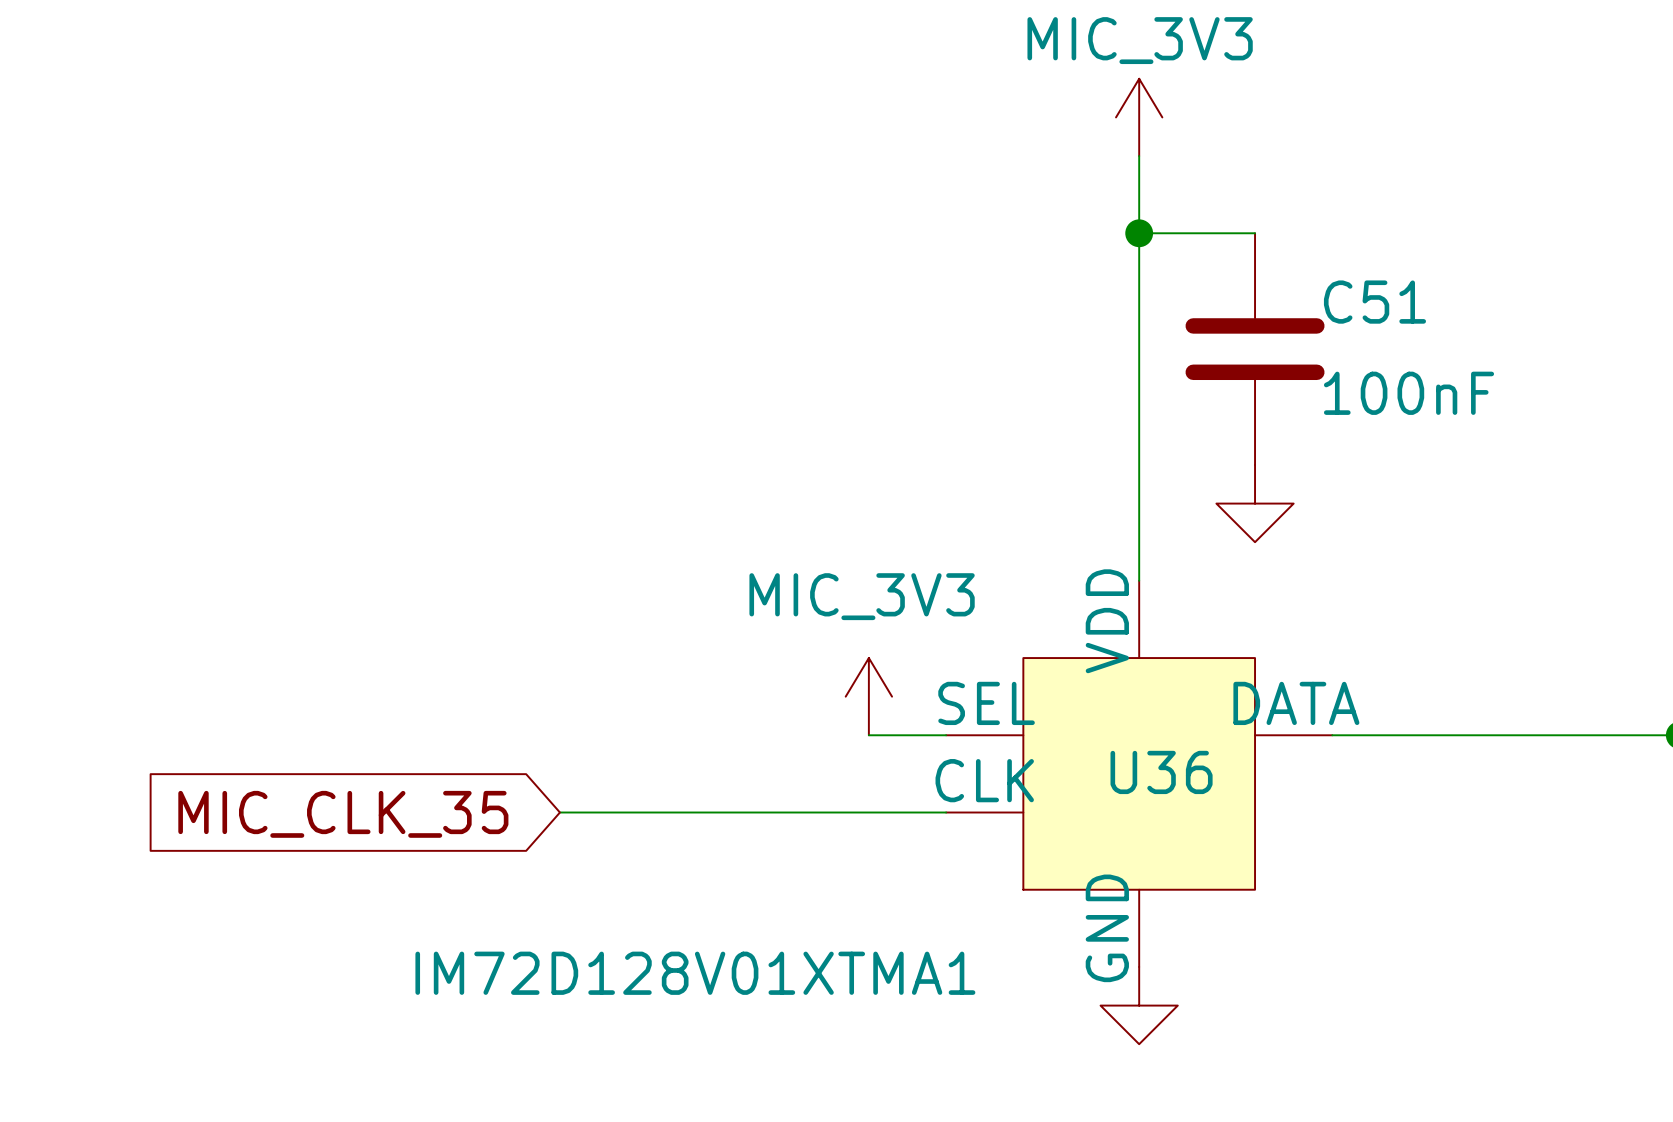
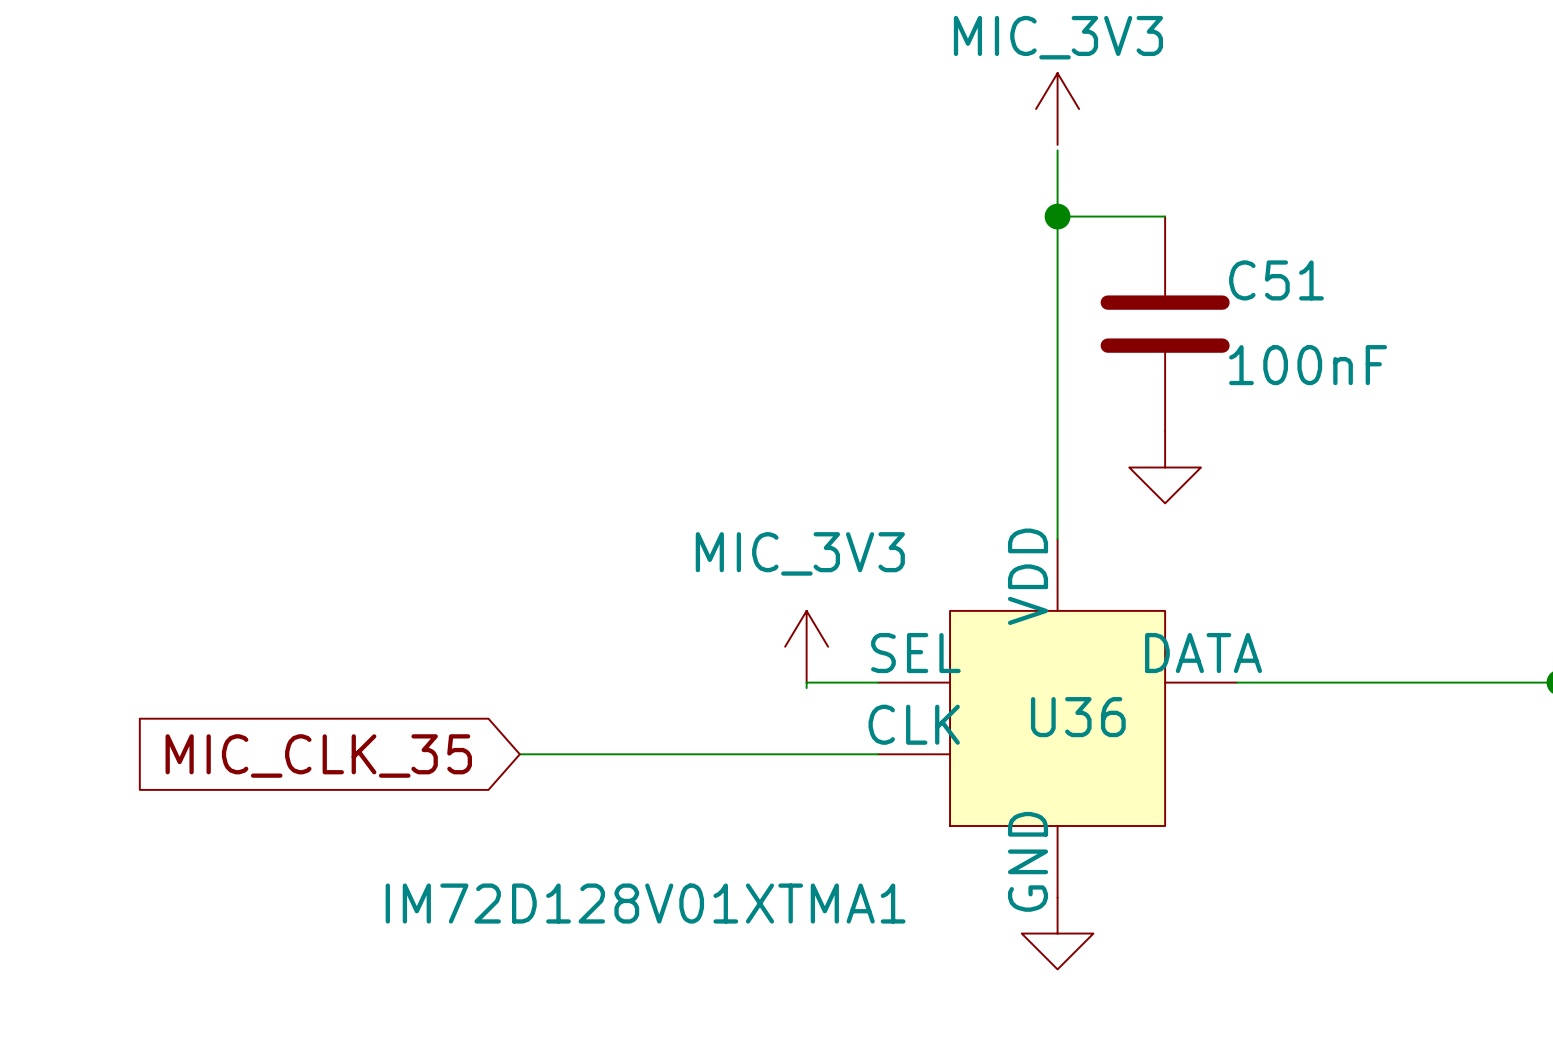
wire: (1139, 156) (1139, 161) -> (806, 682) (806, 688)

